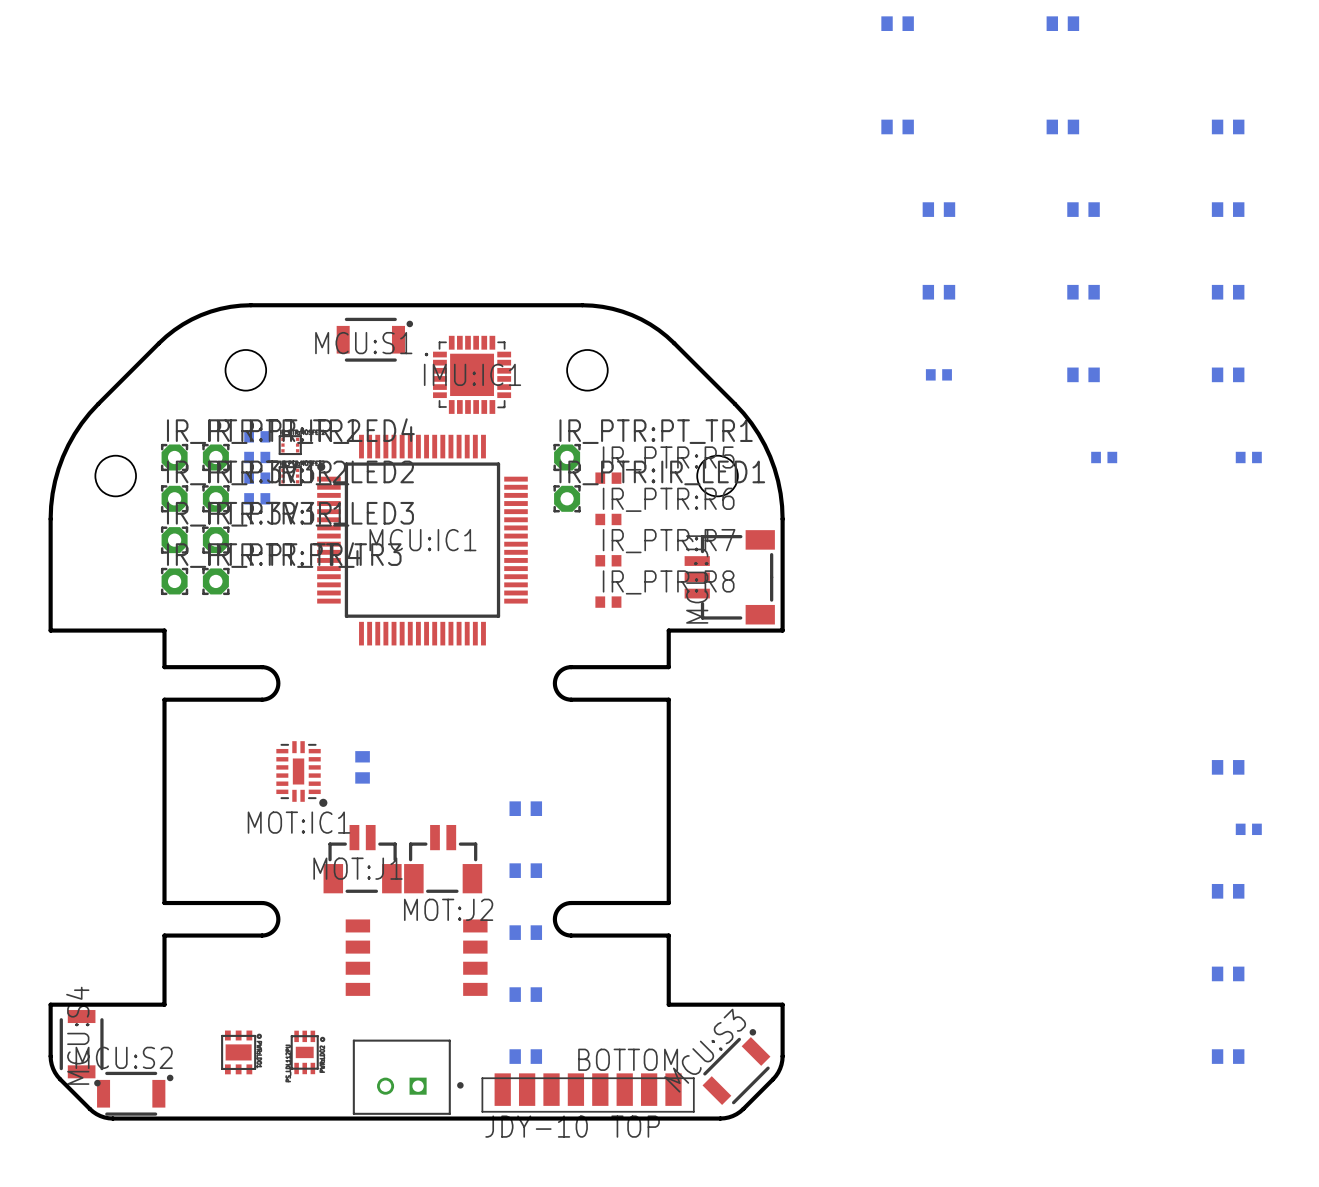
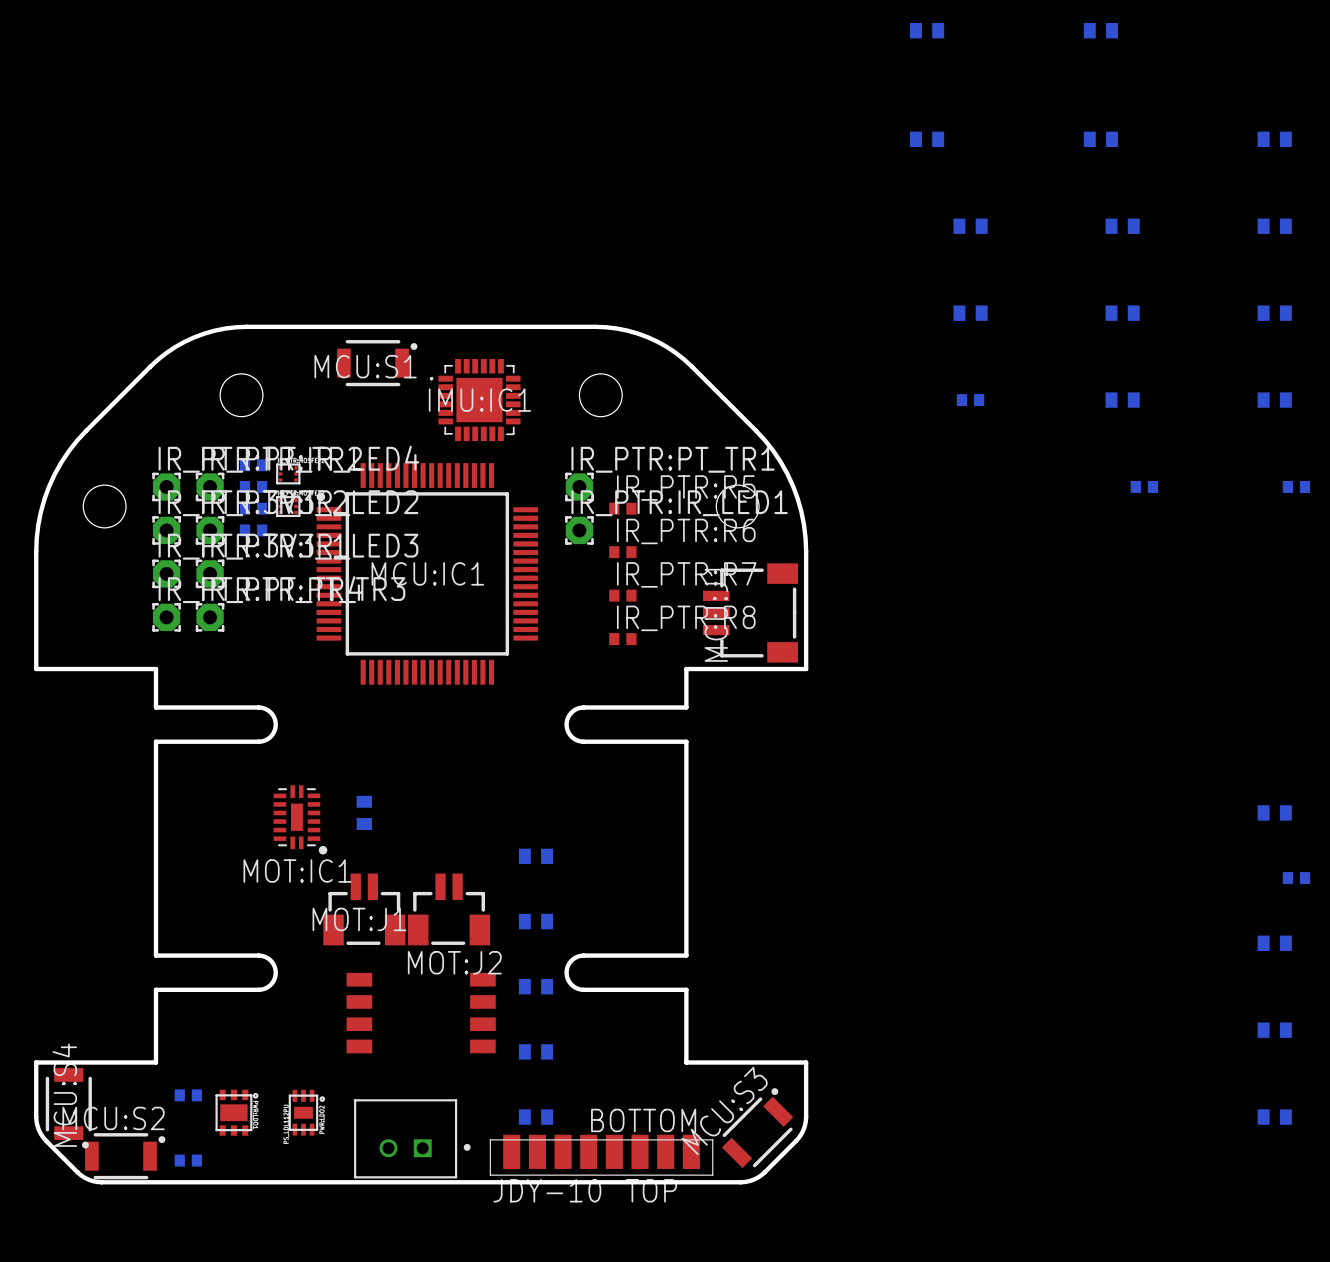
part: none -> (188, 1095)
part: none -> (188, 1160)

